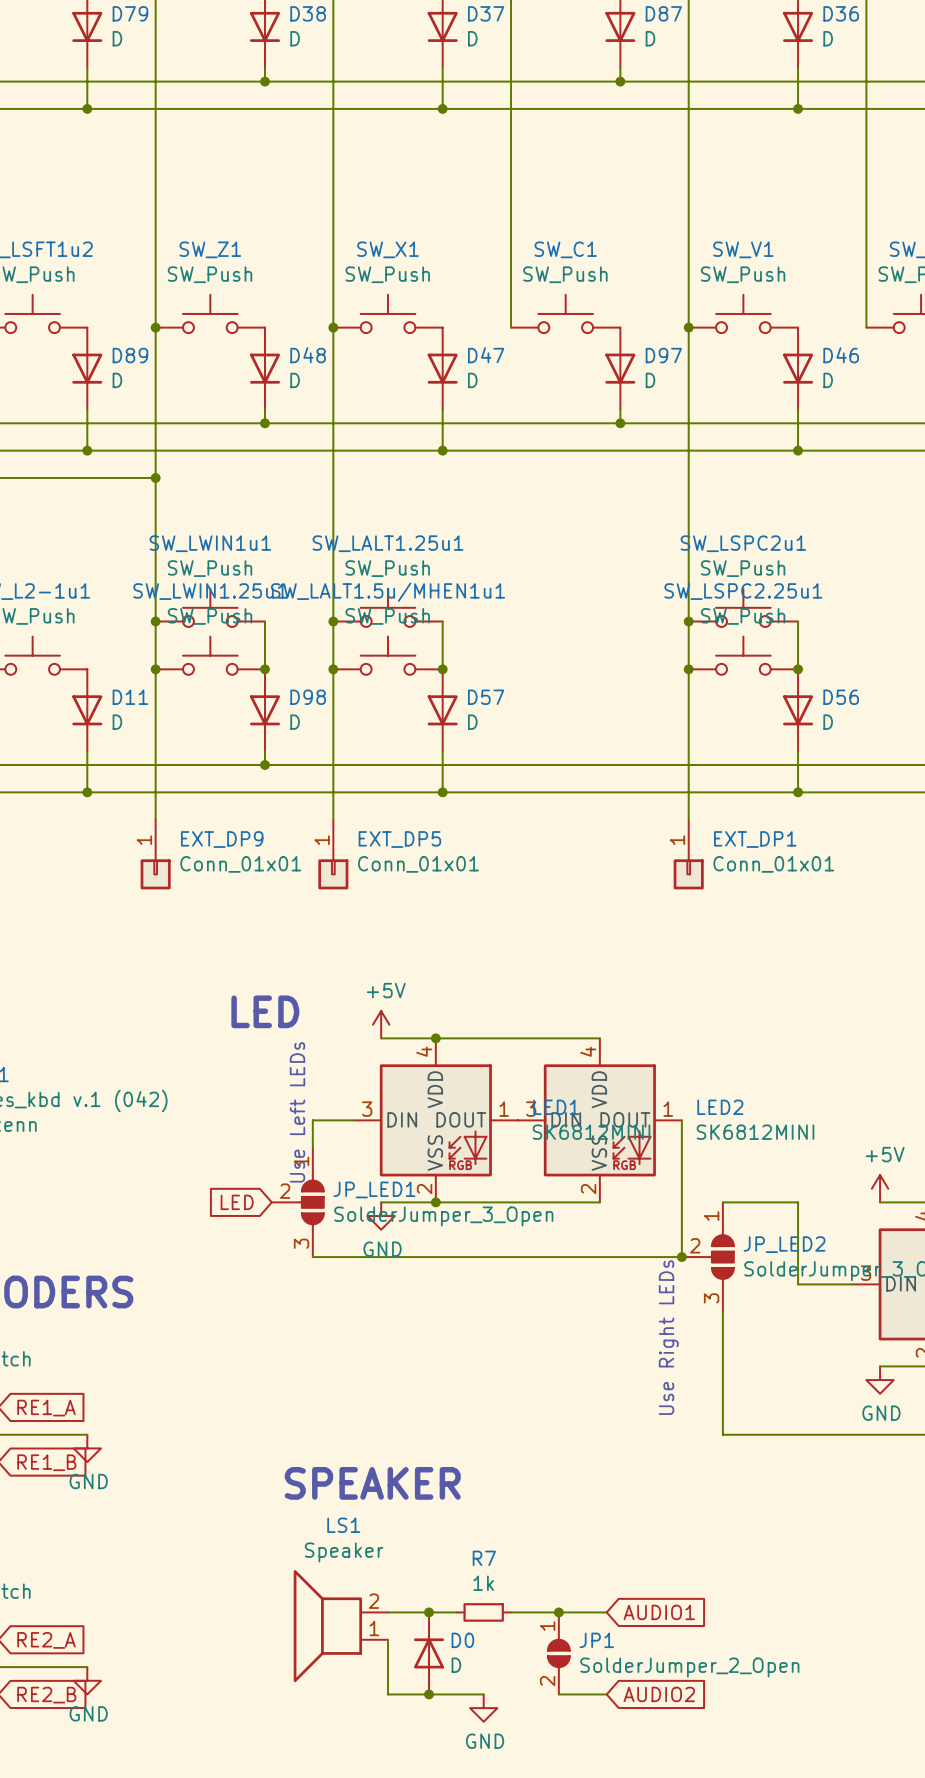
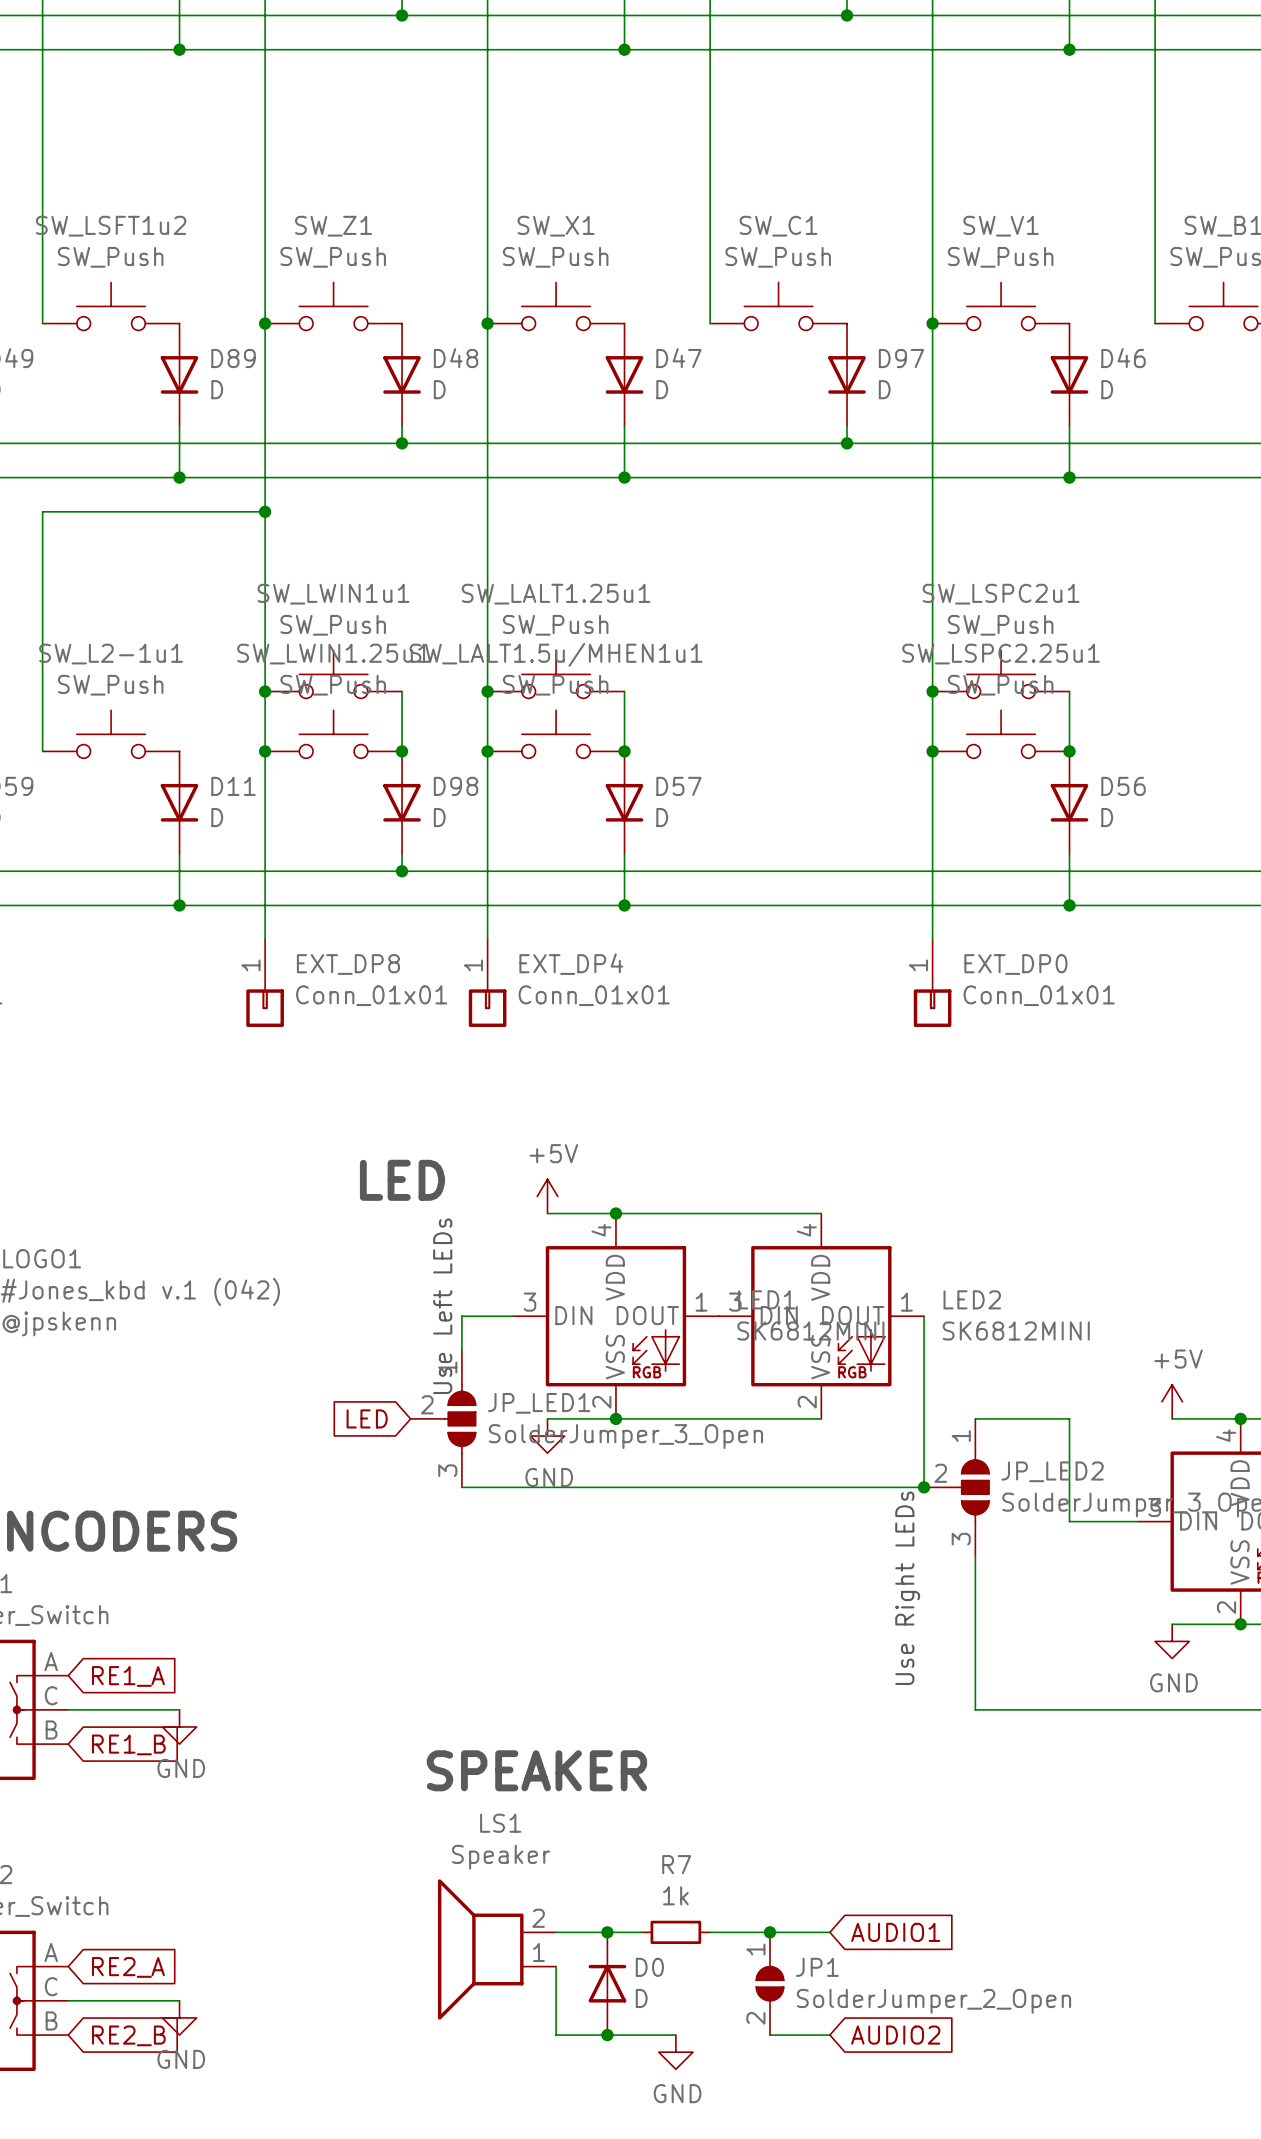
EXT_DP9 name: EXT_DP9 (222, 839) -> EXT_DP8 (348, 964)
EXT_DP5 name: EXT_DP5 (399, 839) -> EXT_DP4 (571, 964)
EXT_DP1 name: EXT_DP1 (755, 839) -> EXT_DP0 (1015, 964)

